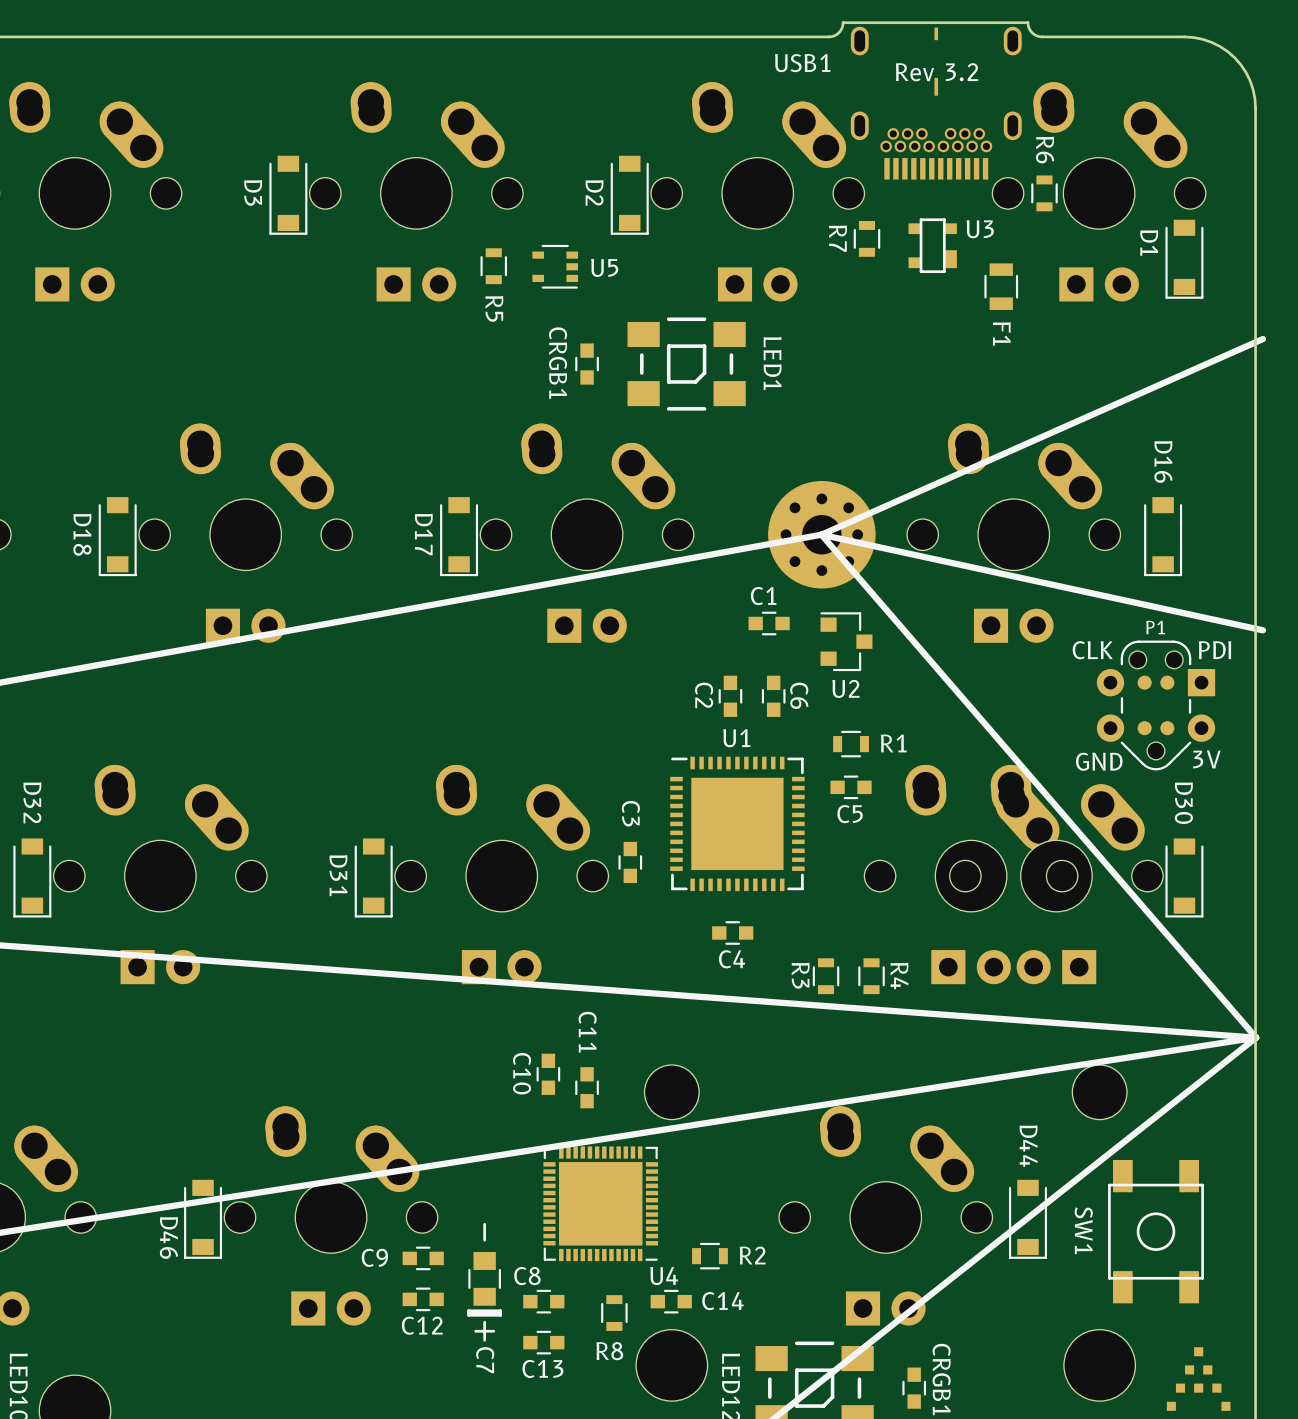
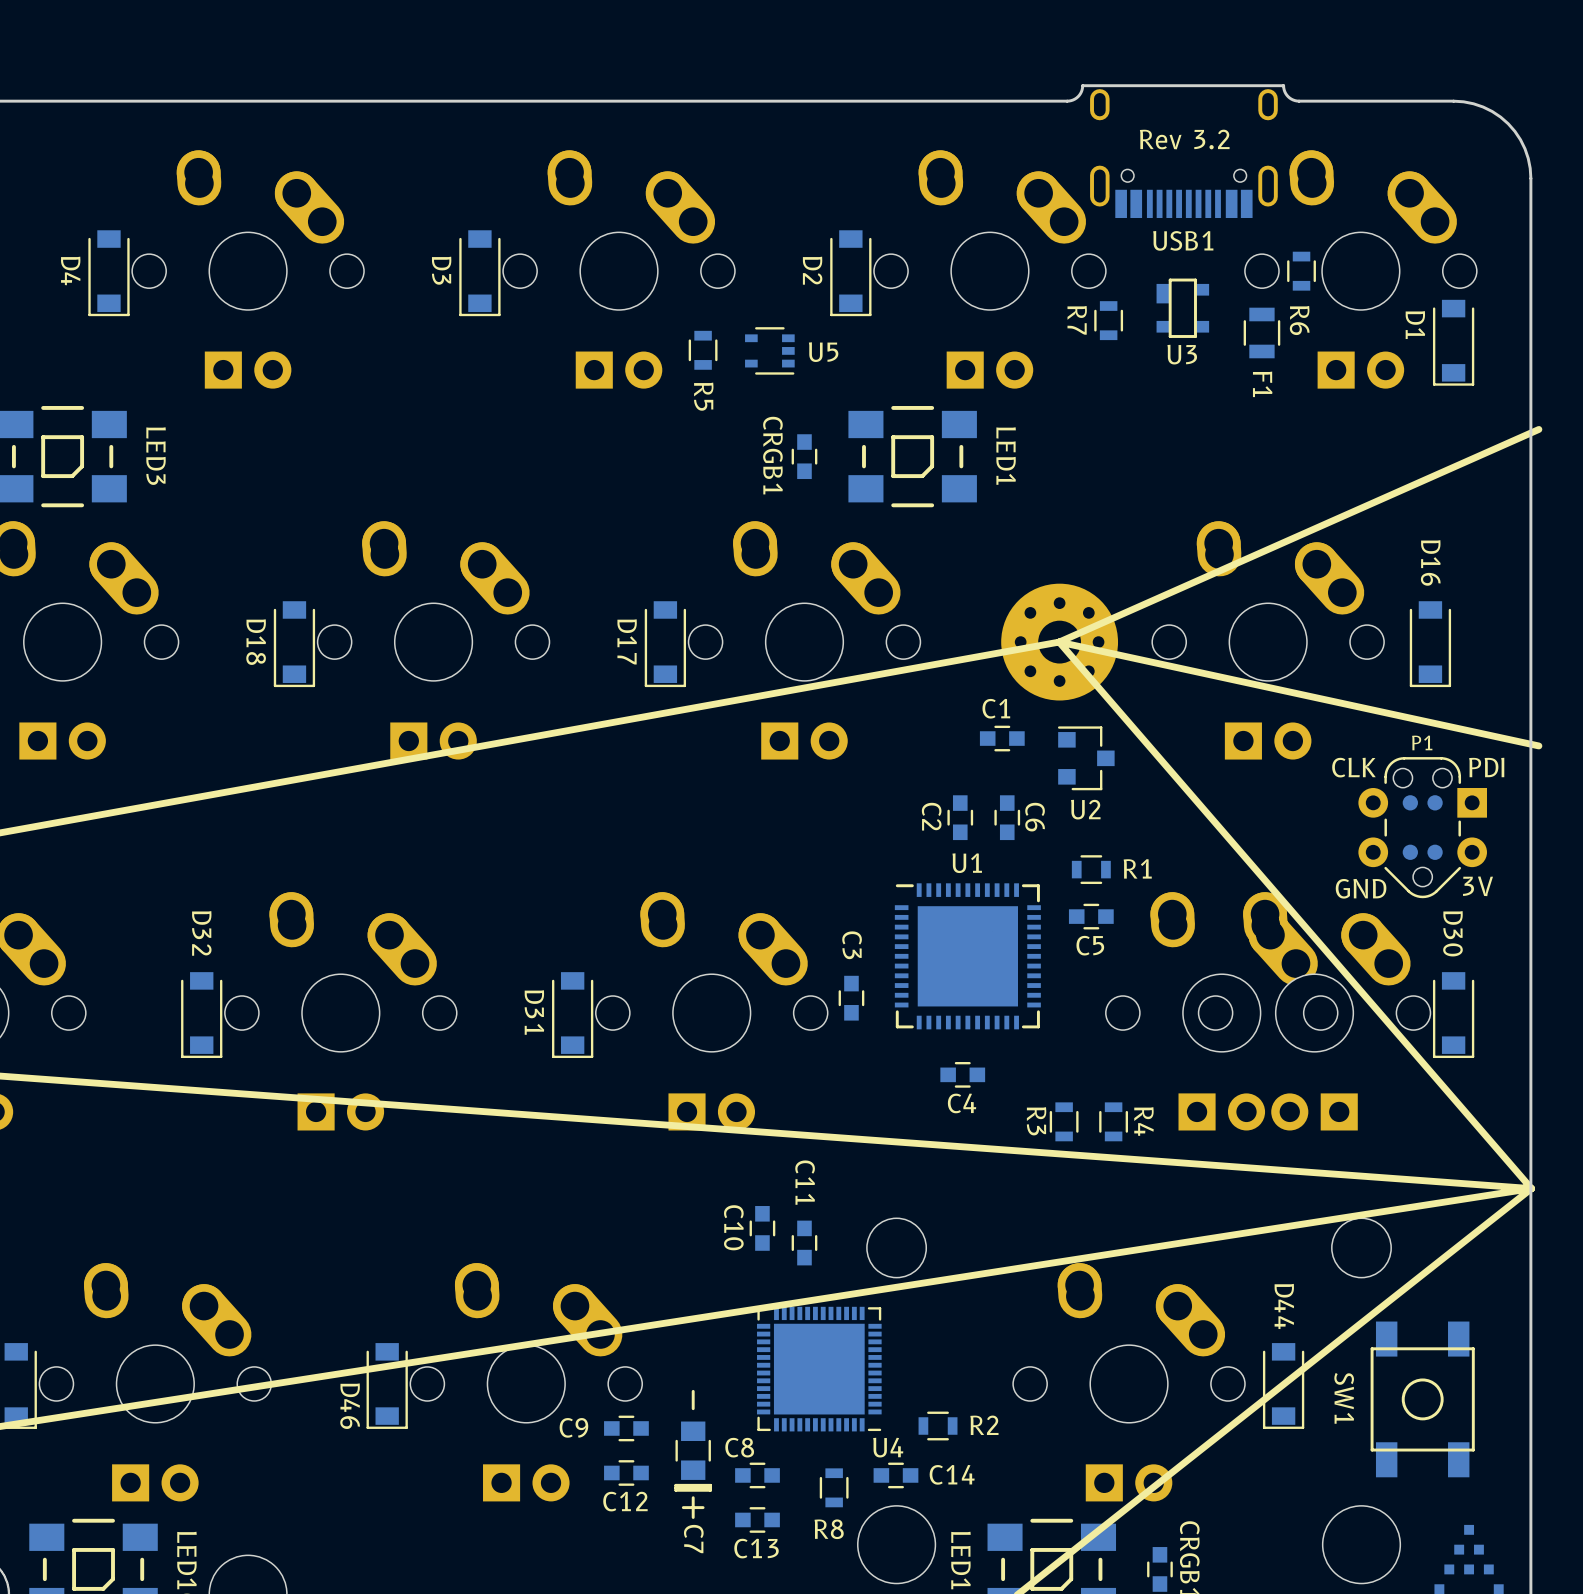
USB1 footprint: [850, 26, 1022, 180] -> [1090, 89, 1278, 219]
USB1 name position: USB1 (802, 63) -> USB1 (1183, 240)
R6 name position: R6 (1045, 150) -> R6 (1299, 320)
U3 name position: U3 (980, 229) -> U3 (1182, 354)
U3 rotation: 0° (932, 245) -> 180° (1182, 308)
F1 position: (1001, 286) -> (1261, 332)

